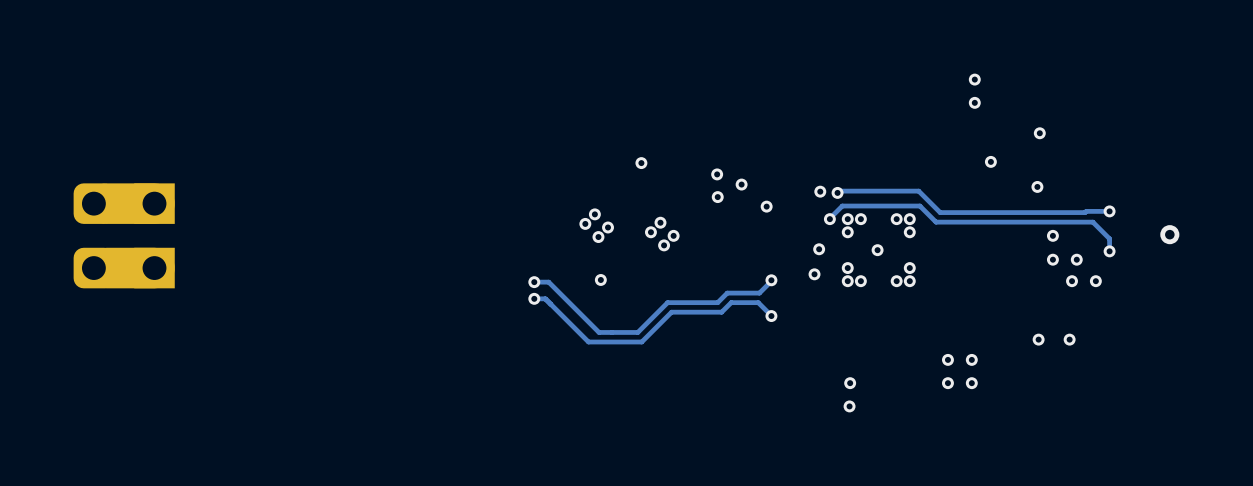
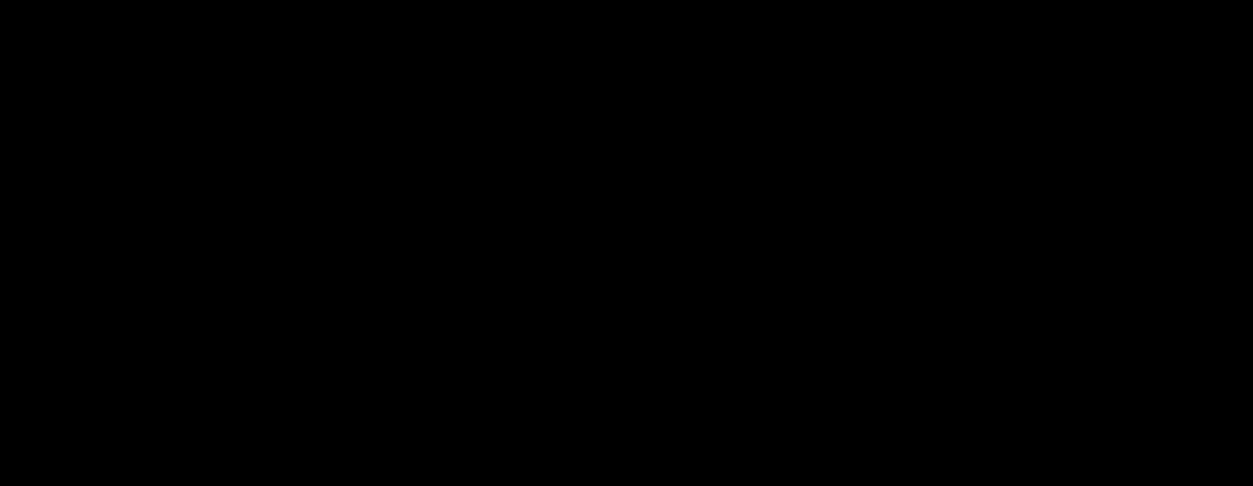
via: (974, 79) -> none
via: (974, 102) -> none
via: (1039, 133) -> none
via: (990, 161) -> none
via: (641, 163) -> none
via: (717, 174) -> none
via: (741, 184) -> none
via: (1037, 186) -> none
via: (820, 191) -> none
track: (837, 192) (839, 191) (918, 191) (940, 212) (1109, 211) -> none
via: (837, 192) -> none
via: (717, 197) -> none
part: (124, 203) -> none
via: (766, 206) -> none
via: (1109, 211) -> none
via: (594, 214) -> none
track: (829, 219) (842, 206) (919, 206) (936, 222) (1092, 222) (1109, 238) (1109, 251) -> none
via: (829, 219) -> none
via: (847, 219) -> none
via: (860, 219) -> none
via: (896, 219) -> none
via: (909, 219) -> none
via: (660, 222) -> none
via: (585, 223) -> none
via: (608, 227) -> none
via: (650, 232) -> none
via: (847, 232) -> none
via: (909, 232) -> none
via: (1169, 234) -> none
via: (673, 235) -> none
via: (1052, 235) -> none
via: (598, 237) -> none
via: (664, 245) -> none
via: (819, 249) -> none
via: (877, 250) -> none
via: (1109, 251) -> none
via: (1052, 259) -> none
via: (1076, 259) -> none
part: (124, 268) -> none
via: (847, 268) -> none
via: (909, 268) -> none
via: (814, 274) -> none
via: (600, 279) -> none
track: (771, 280) (759, 293) (727, 293) (717, 302) (667, 302) (637, 332) (599, 332) (548, 282) (534, 282) -> none
via: (771, 280) -> none
via: (847, 281) -> none
via: (860, 281) -> none
via: (896, 281) -> none
via: (909, 281) -> none
via: (1072, 281) -> none
via: (1095, 281) -> none
via: (534, 282) -> none
track: (534, 298) (545, 298) (588, 342) (641, 342) (671, 312) (721, 312) (731, 302) (758, 302) (771, 315) -> none
via: (534, 298) -> none
via: (771, 316) -> none
via: (1038, 339) -> none
via: (1069, 339) -> none
via: (947, 359) -> none
via: (971, 359) -> none
via: (850, 383) -> none
via: (947, 383) -> none
via: (971, 383) -> none
via: (849, 406) -> none

